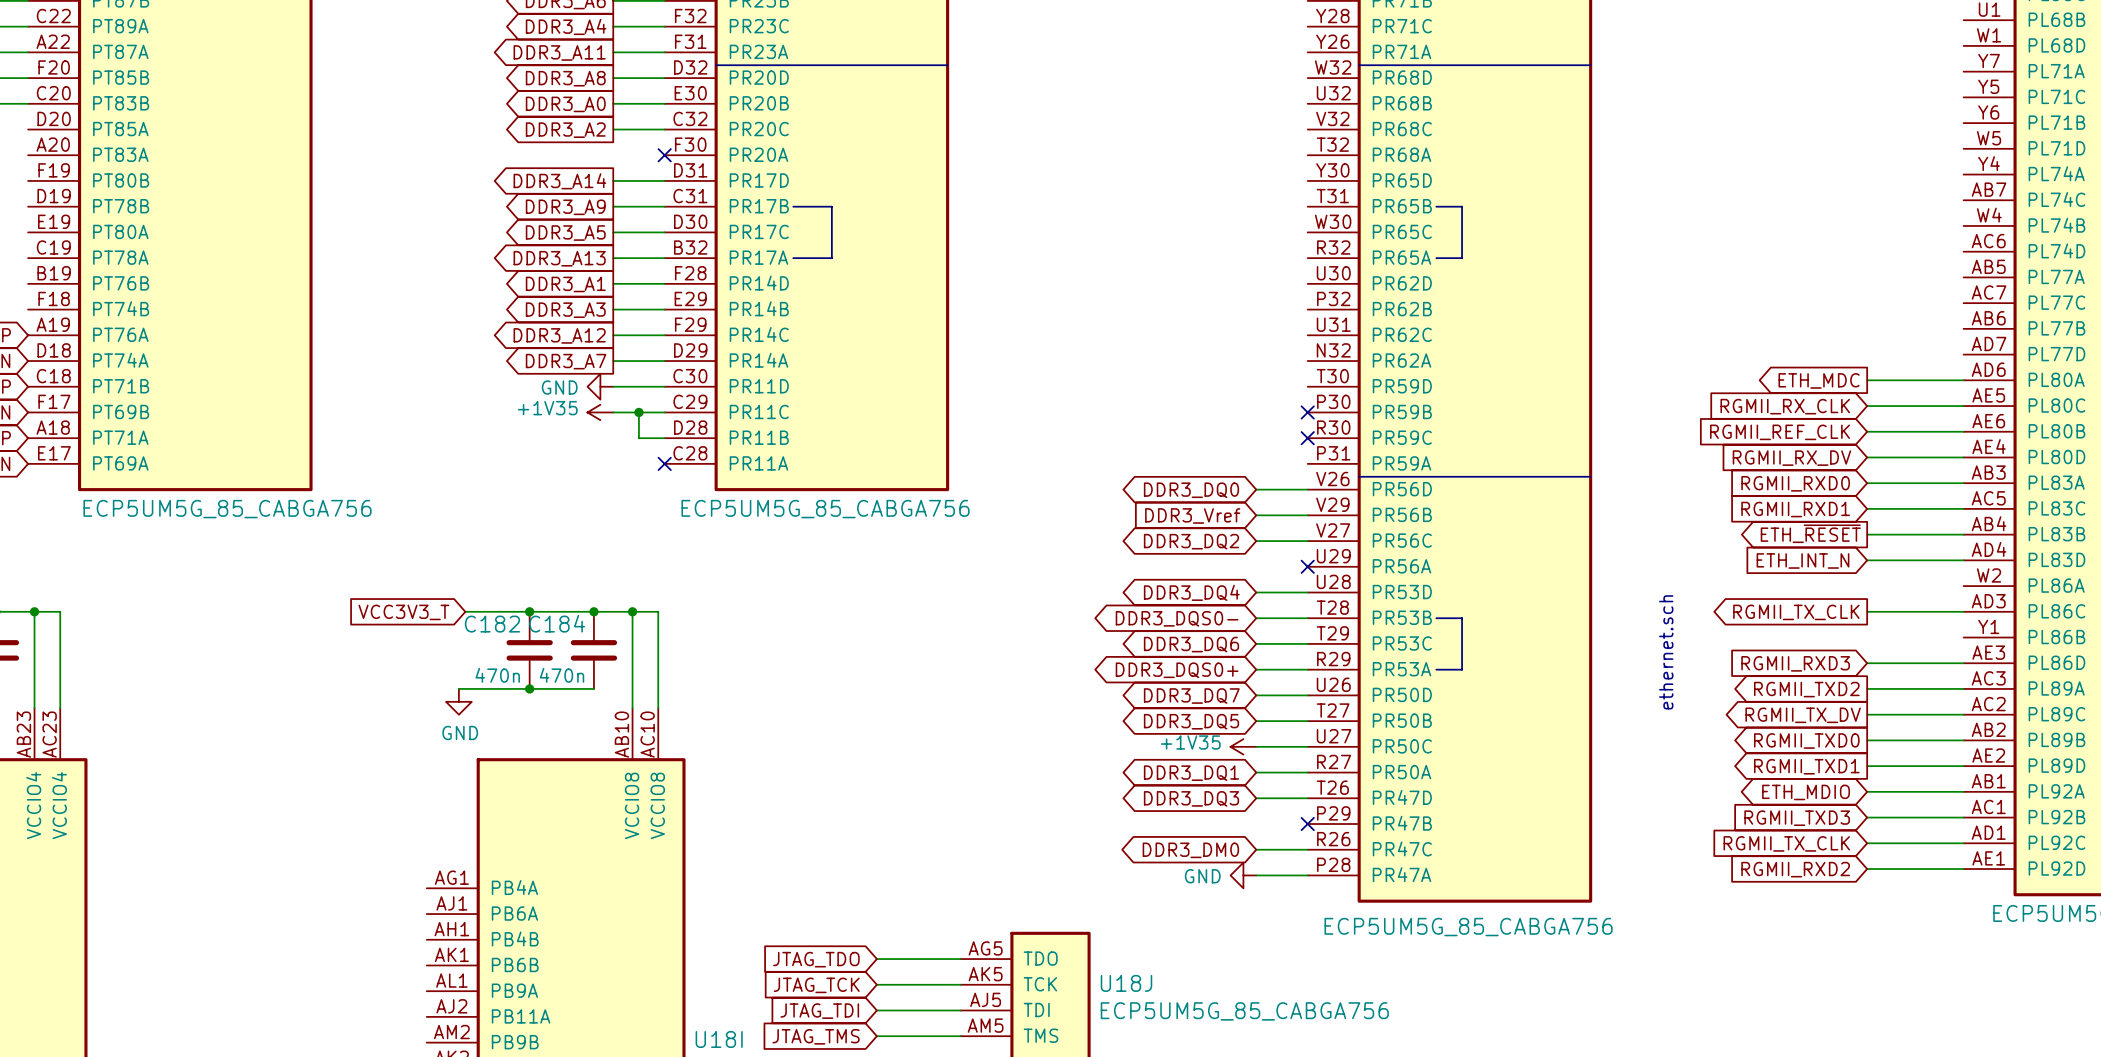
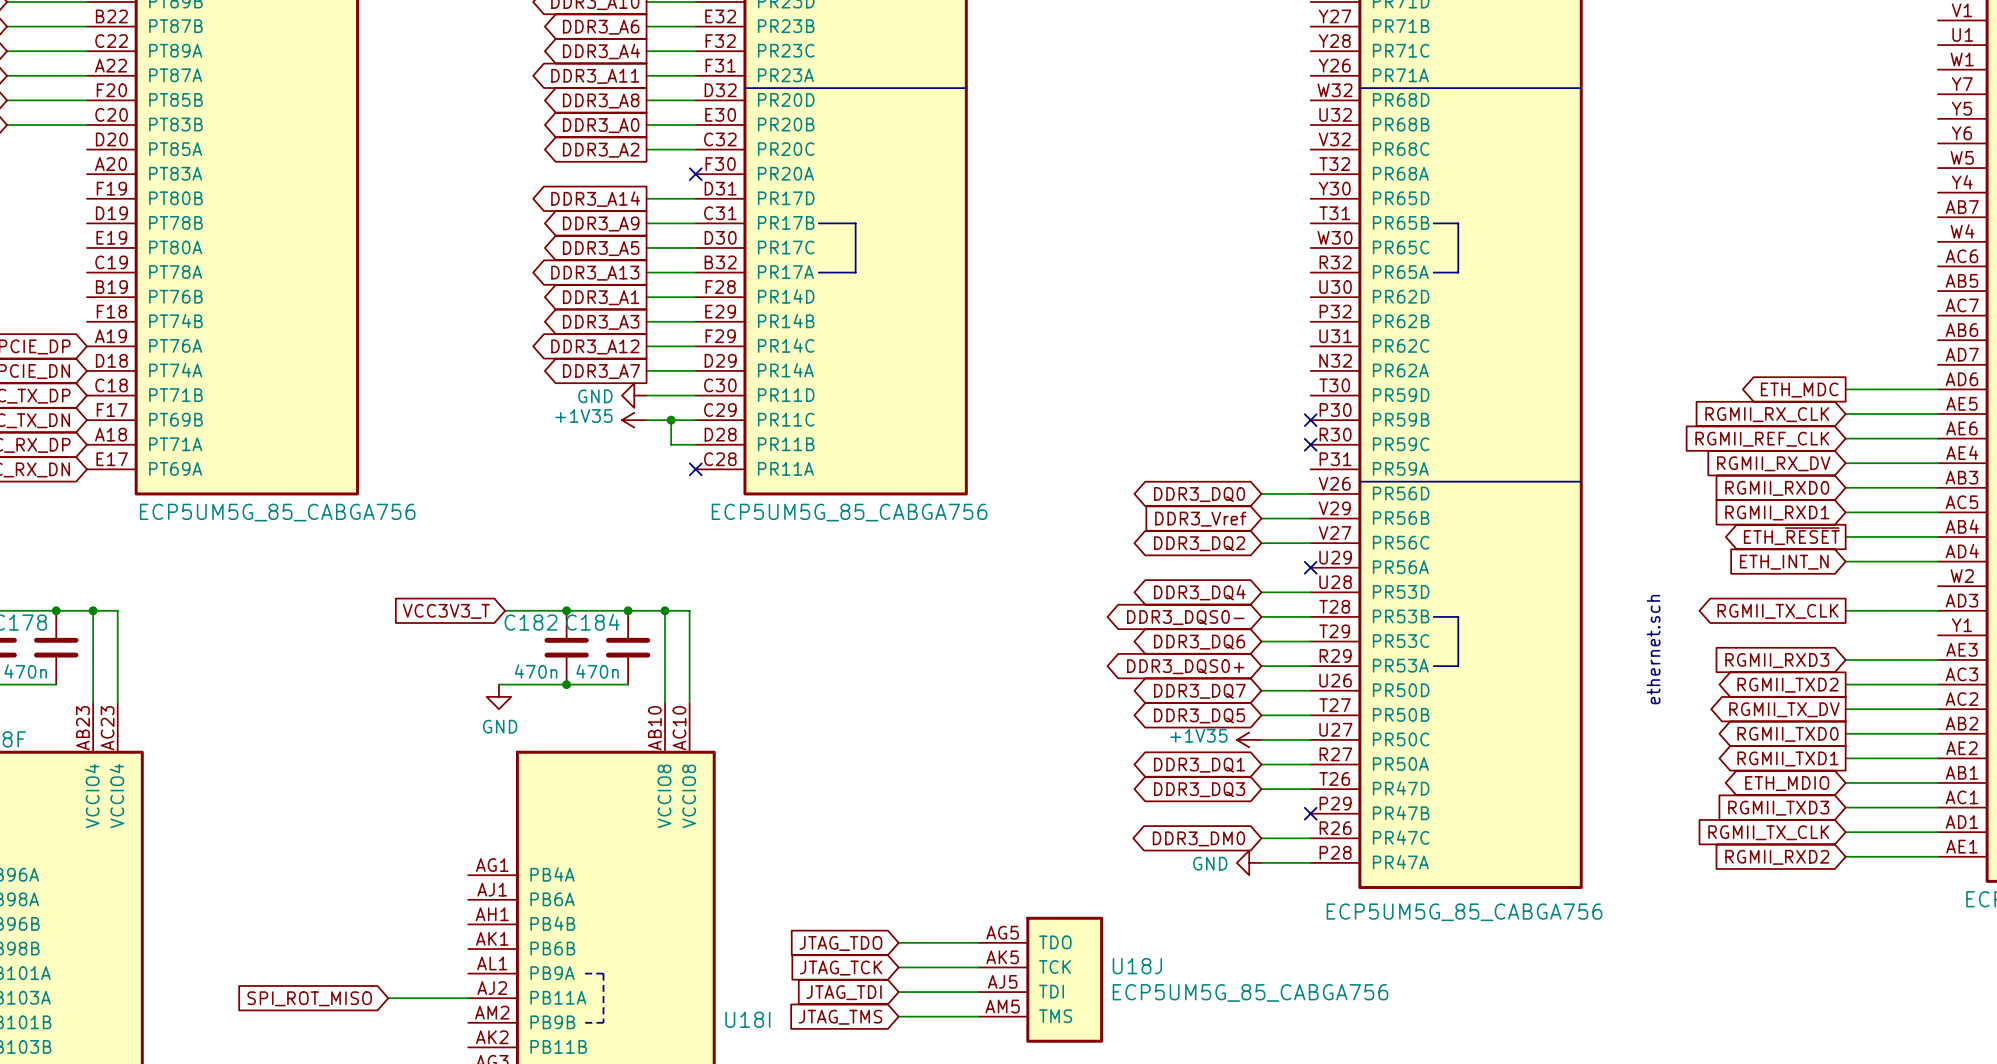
line: none -> (585, 973) (603, 973) (603, 1022) (585, 1022)
wire: none -> (388, 998) (468, 998)
global label: none -> SPI_ROT_MISO (309, 998)

